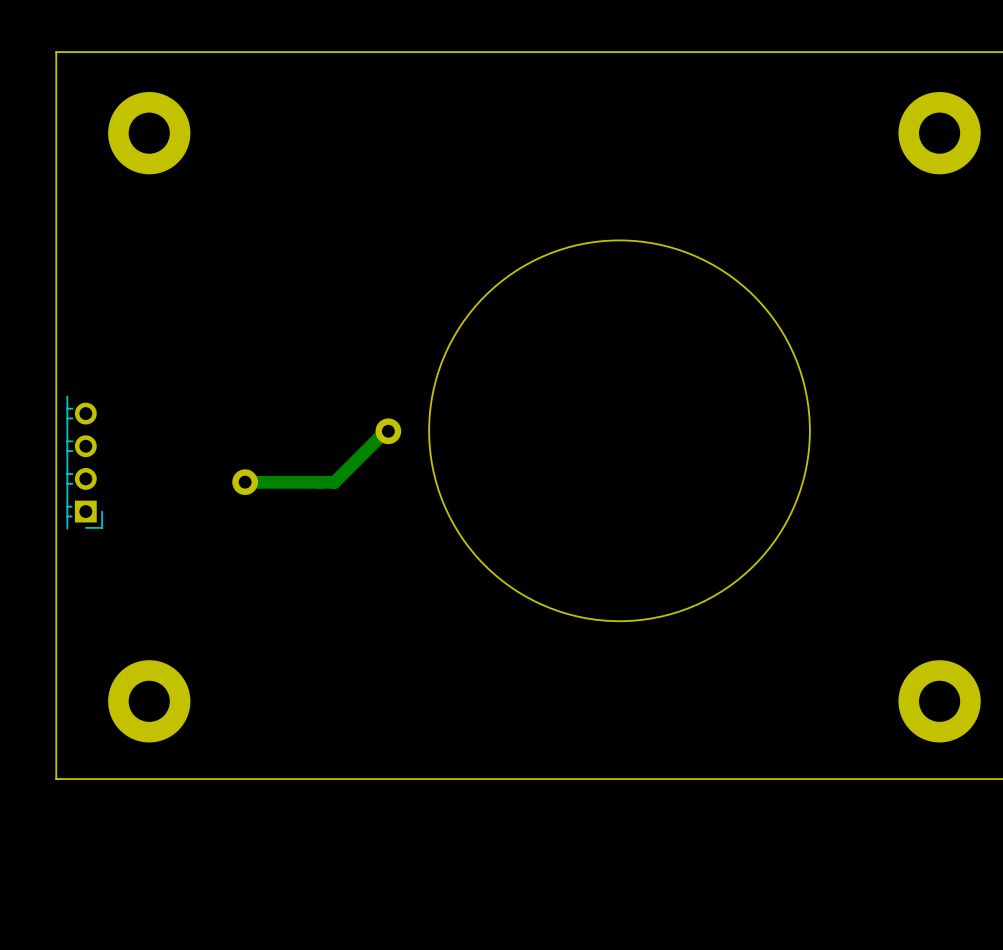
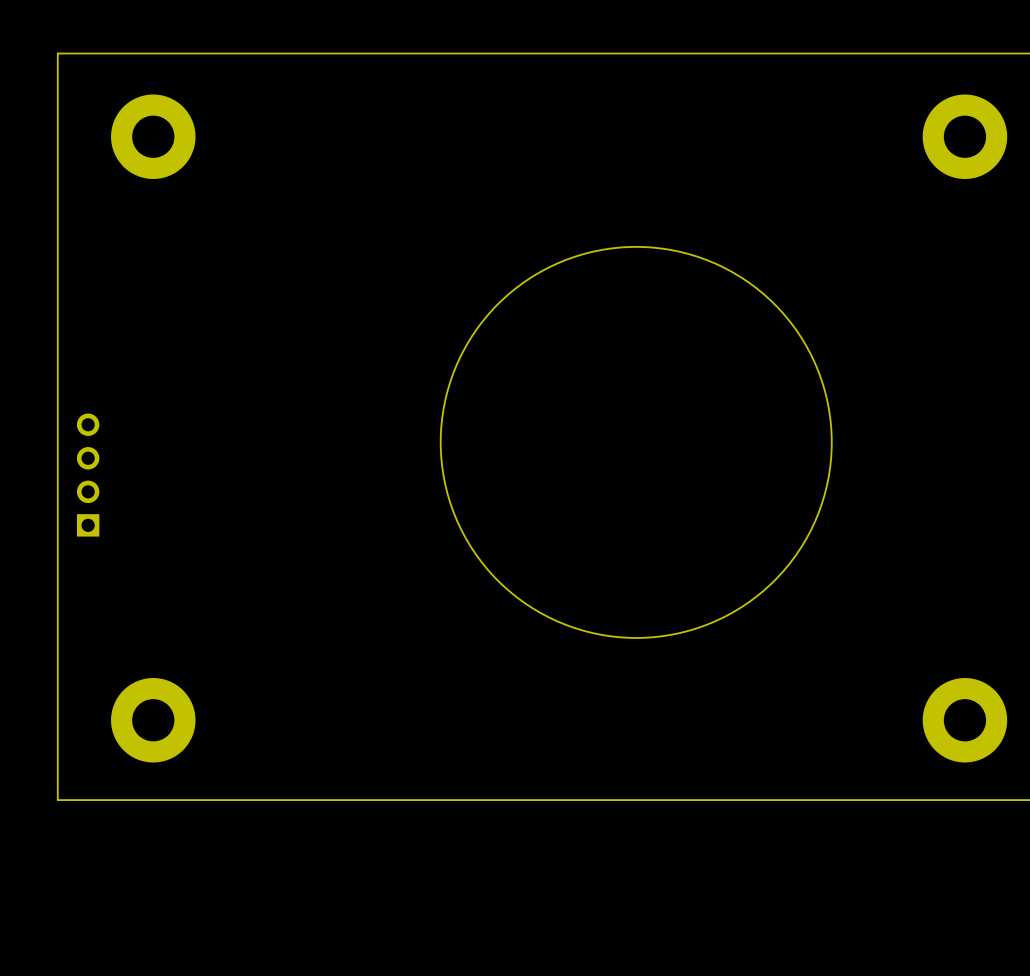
part: (316, 456) -> none
part side: bottom (84, 462) -> top (88, 475)

